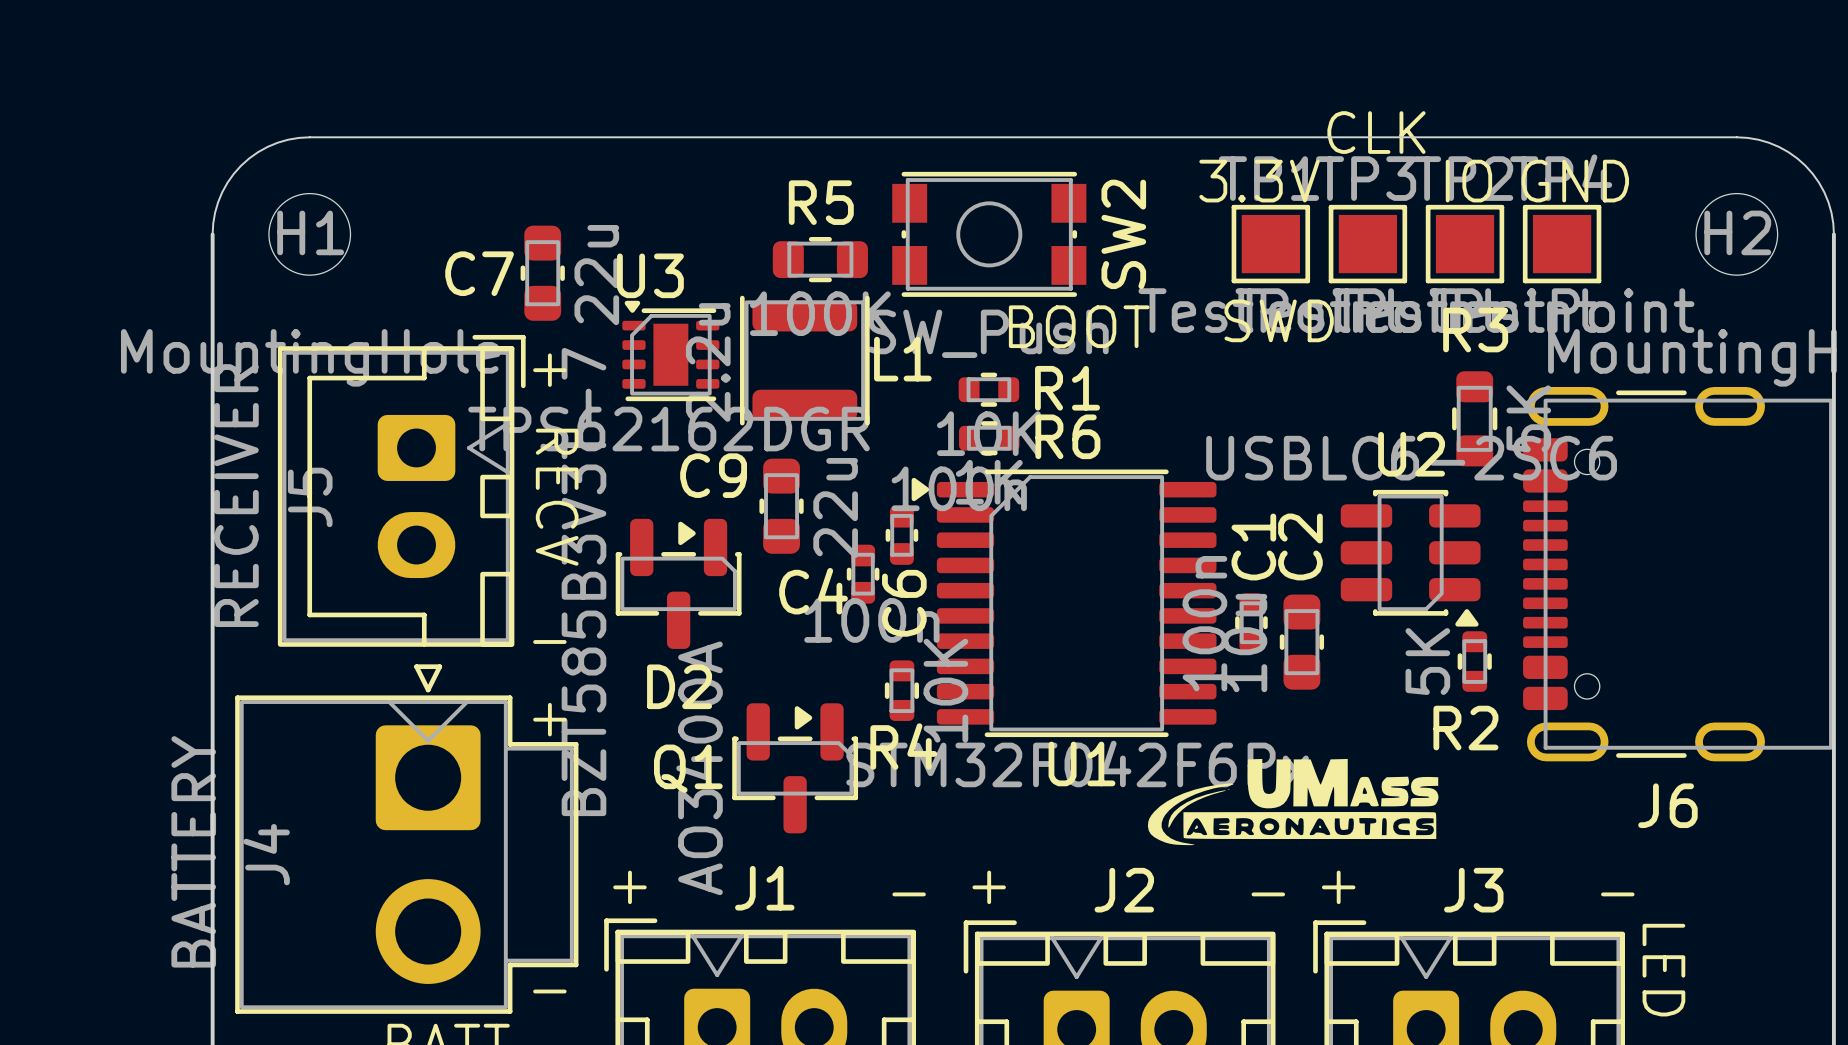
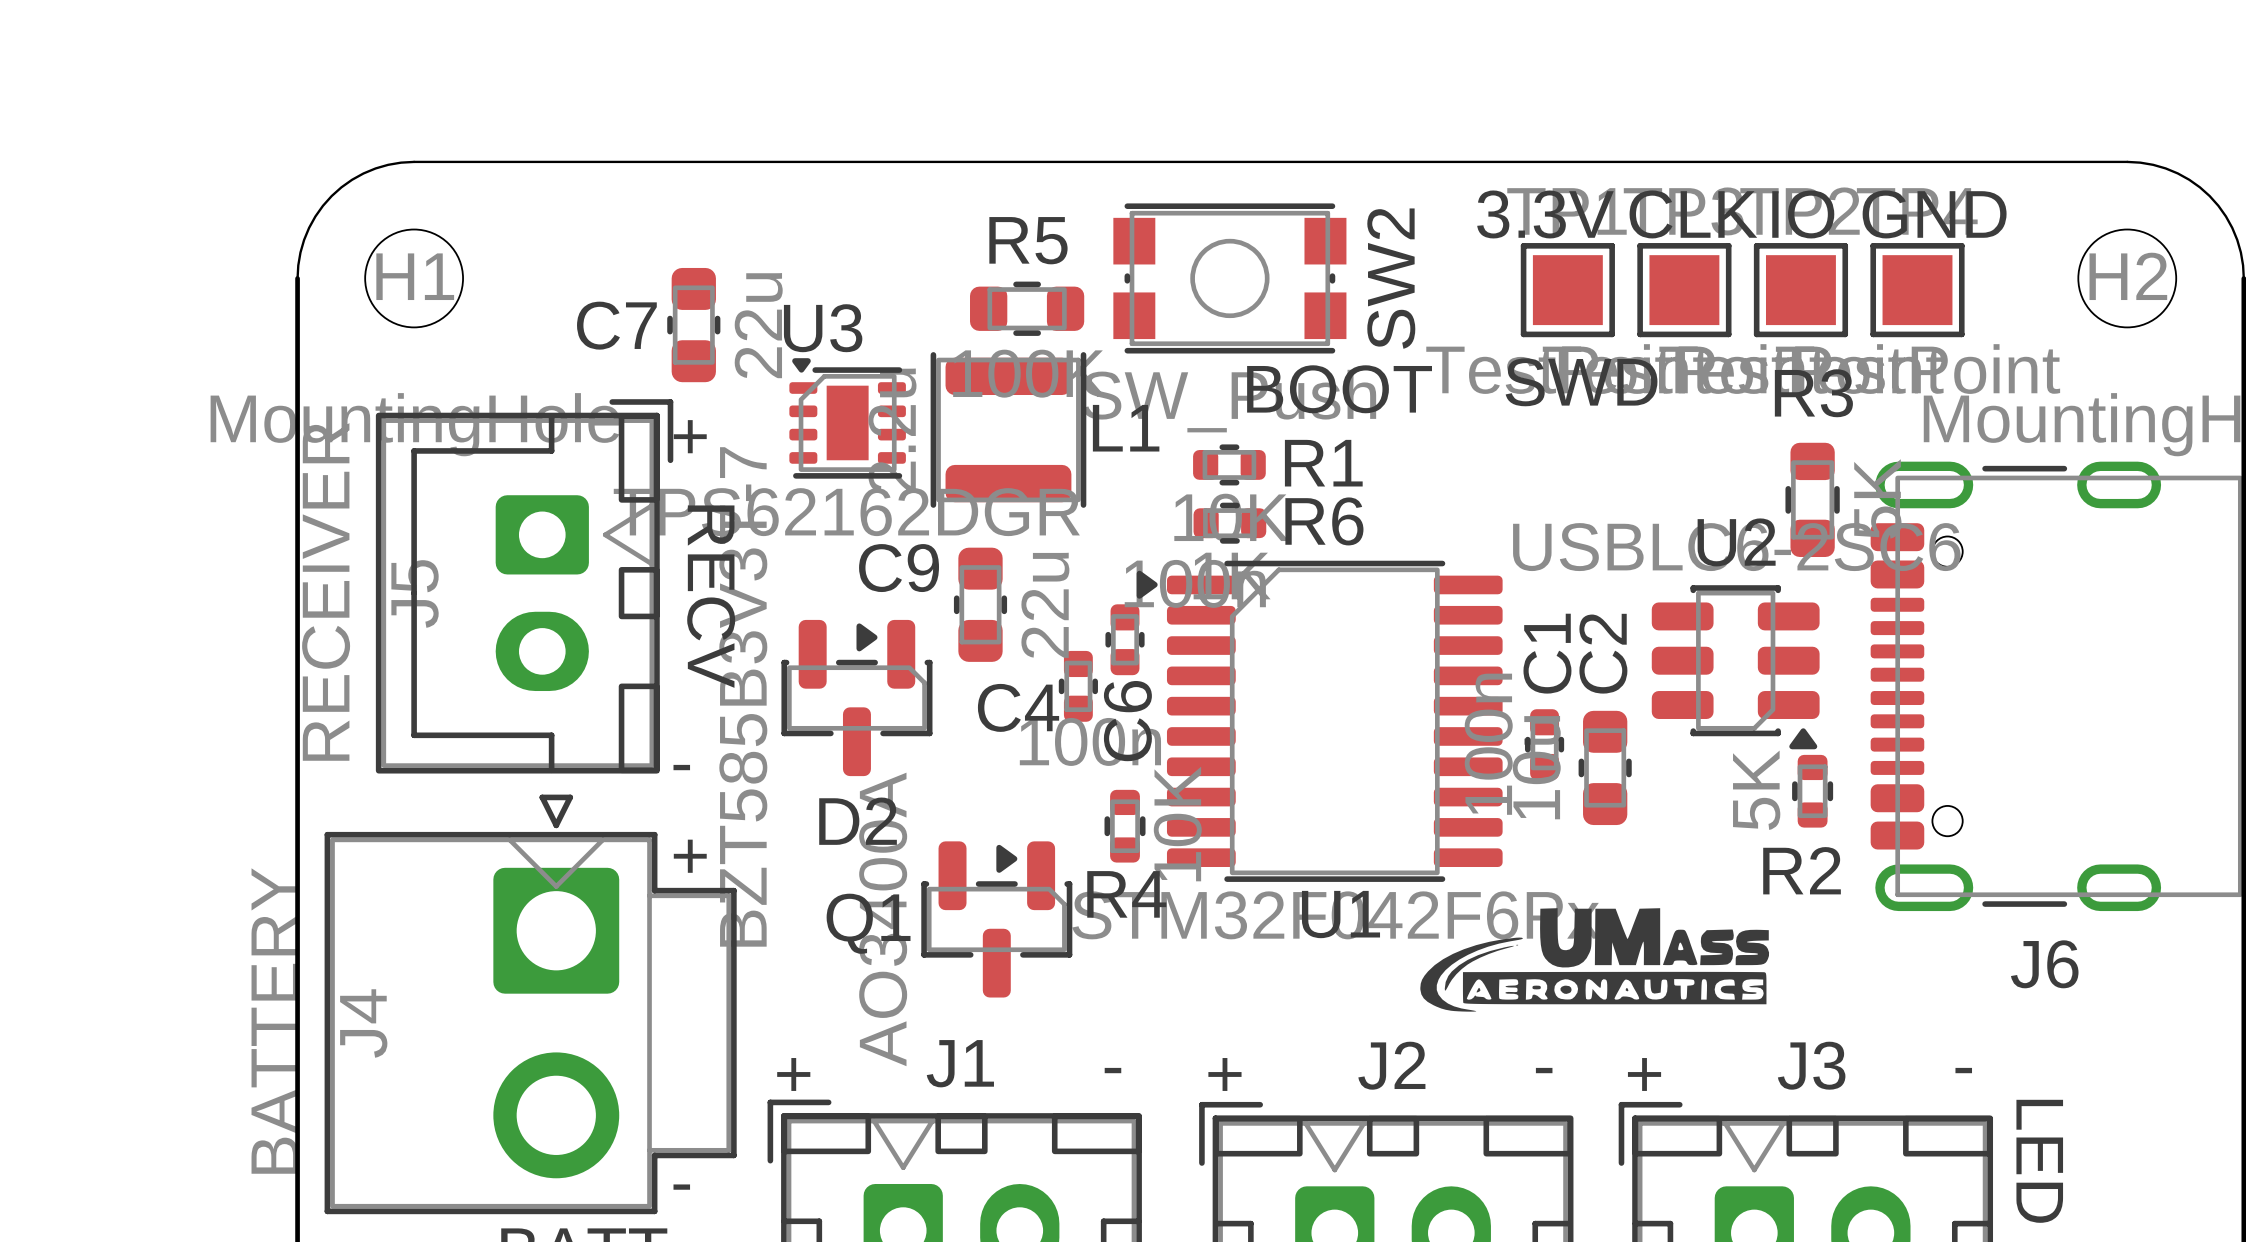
text position: CLK (1376, 132) -> CLK (1693, 214)

